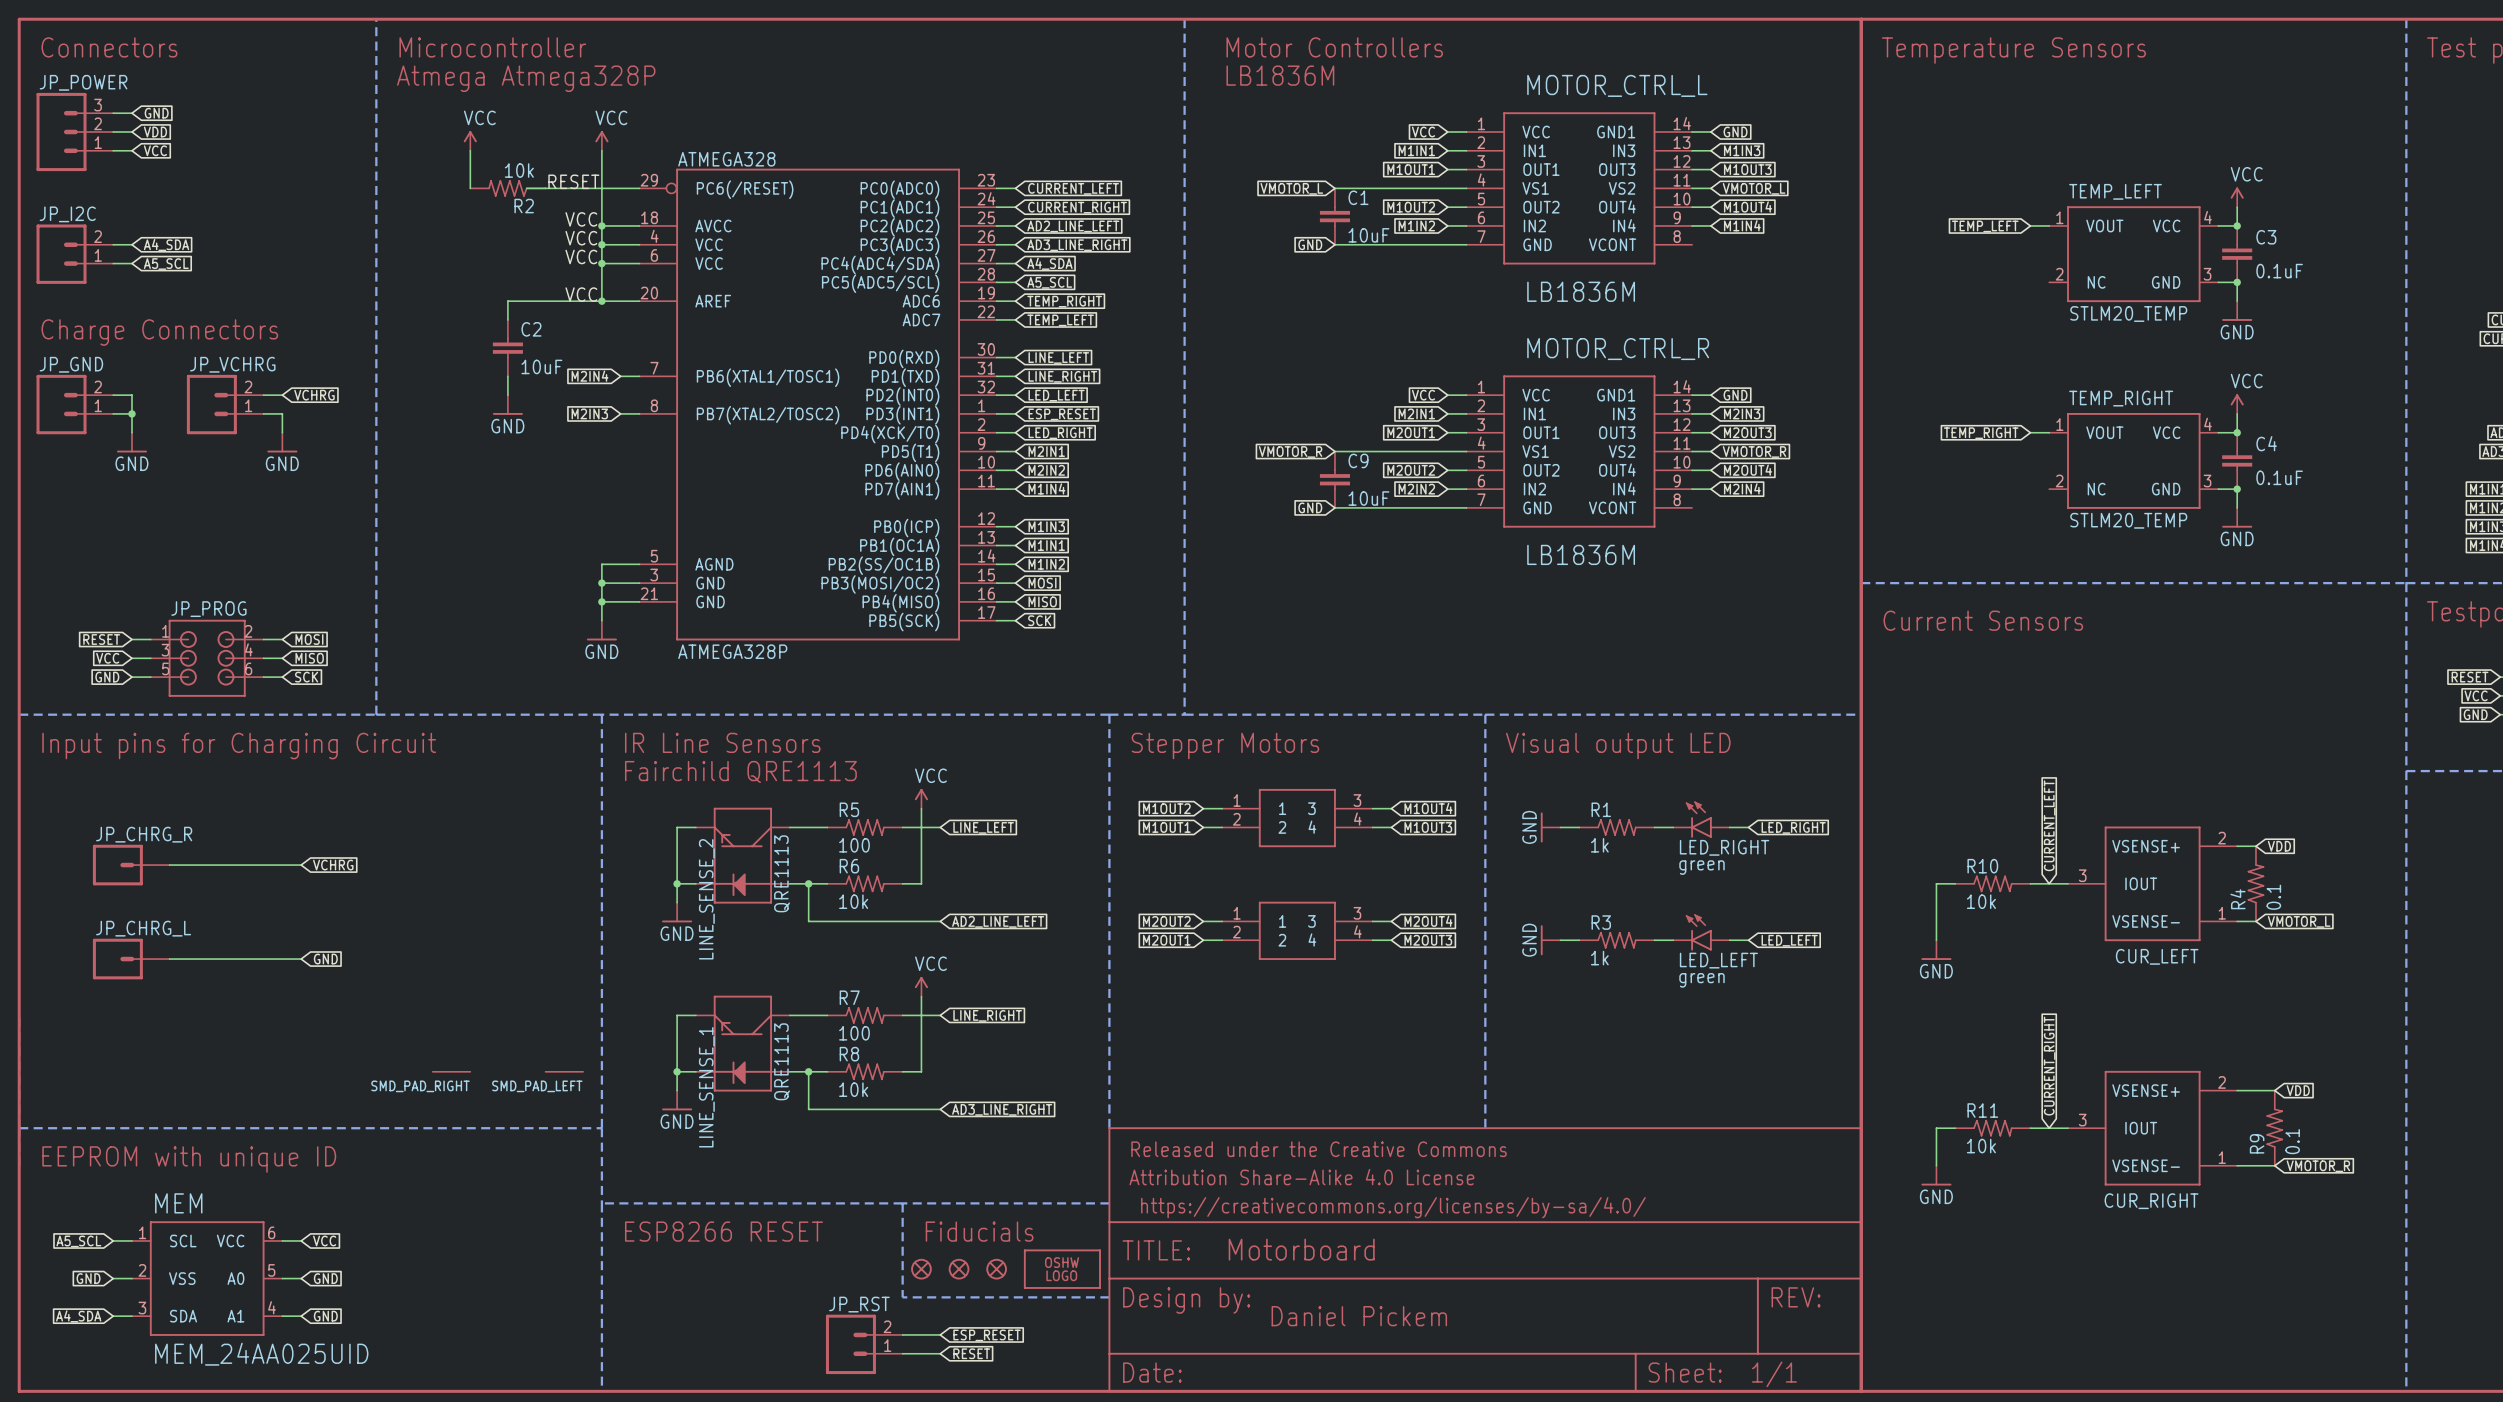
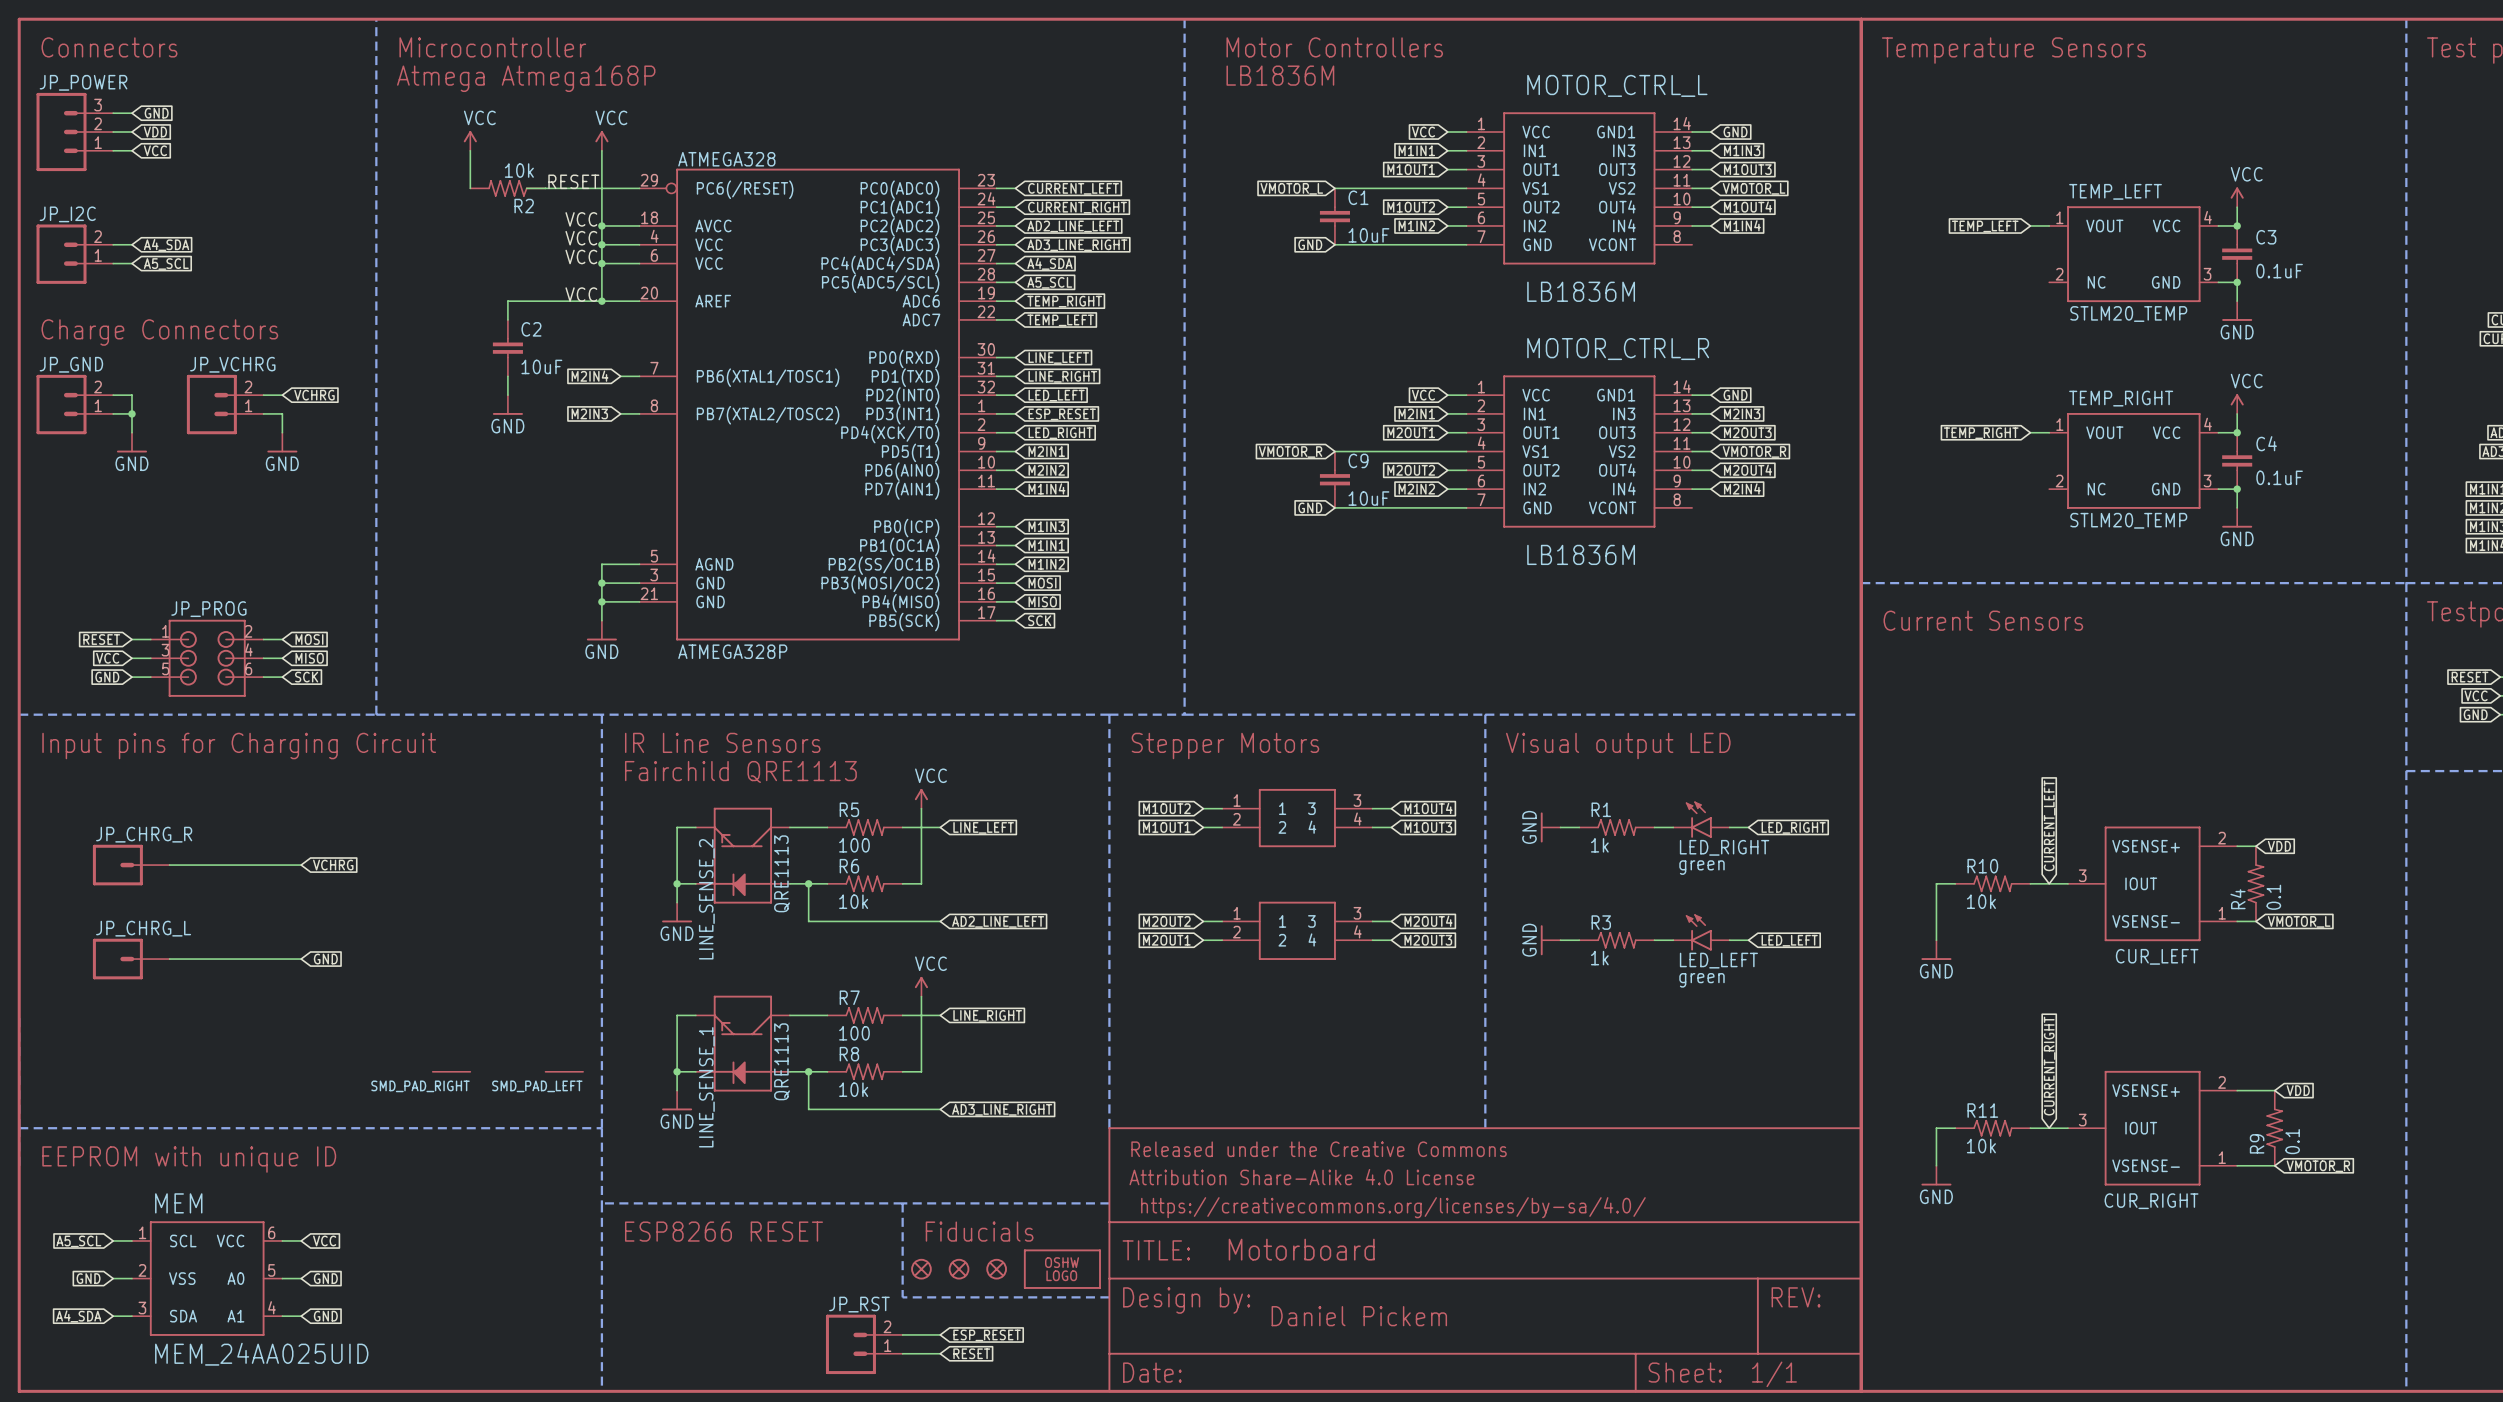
text: Atmega Atmega328P (526, 78) -> Atmega Atmega168P (526, 78)

